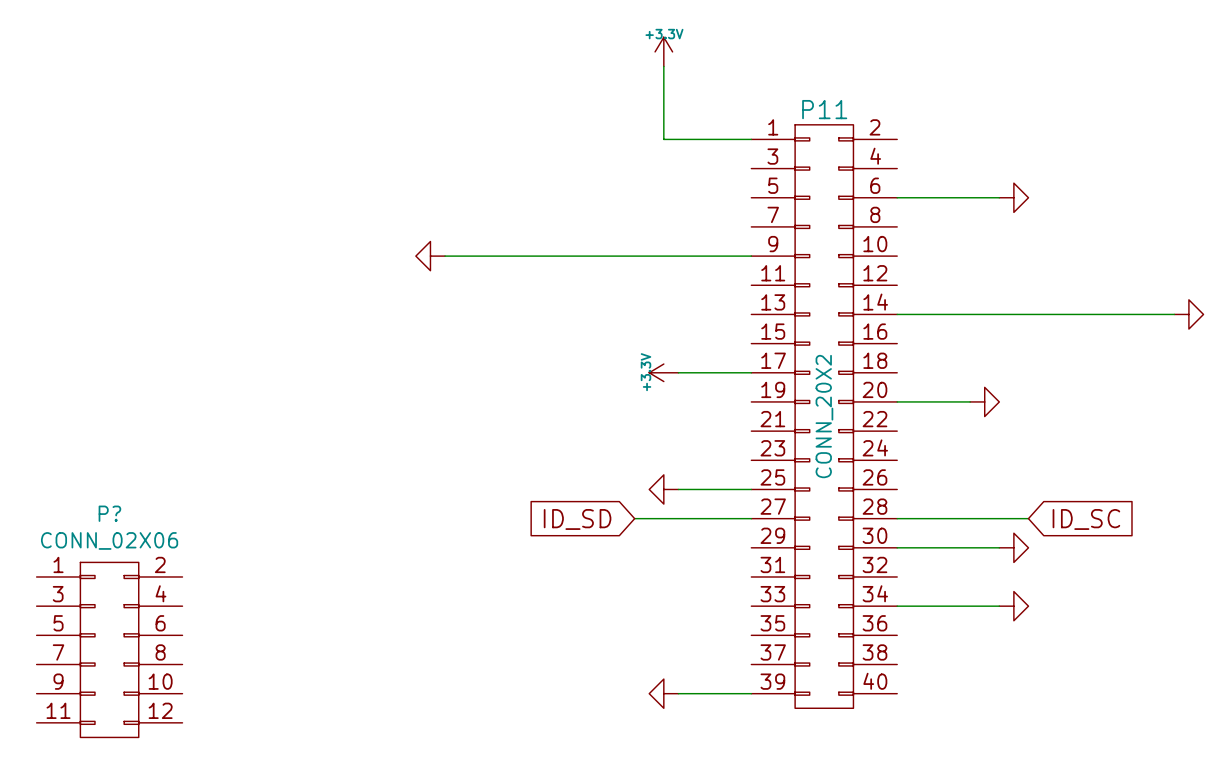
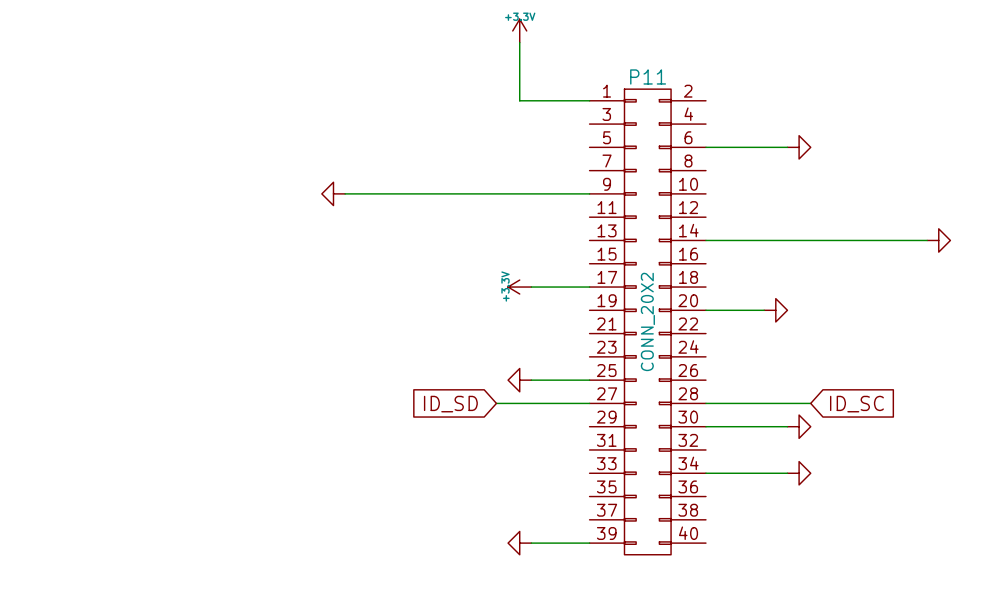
P?: CONN_02X06 (109, 649) -> none

